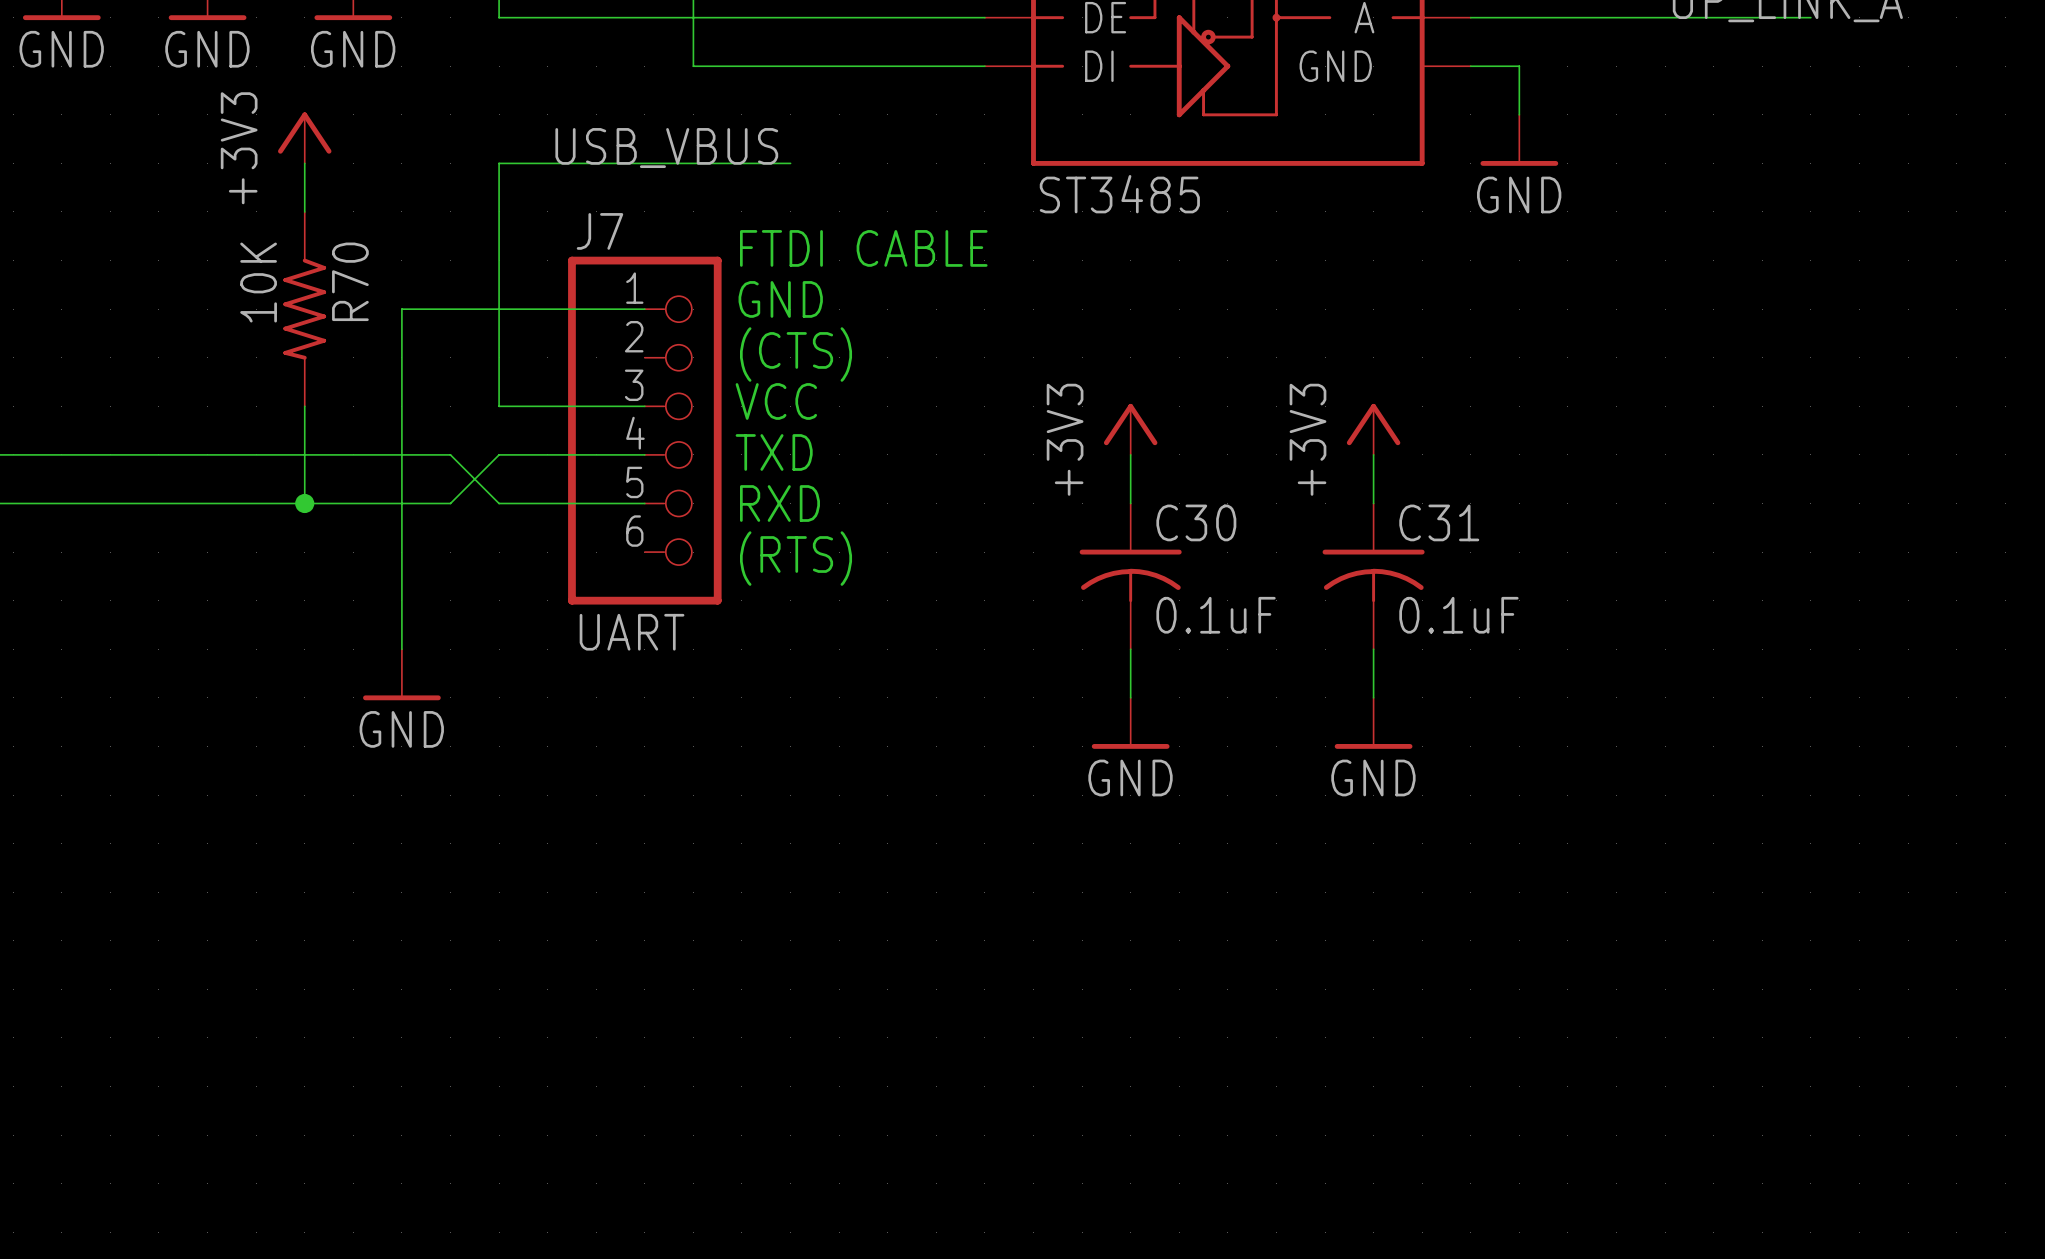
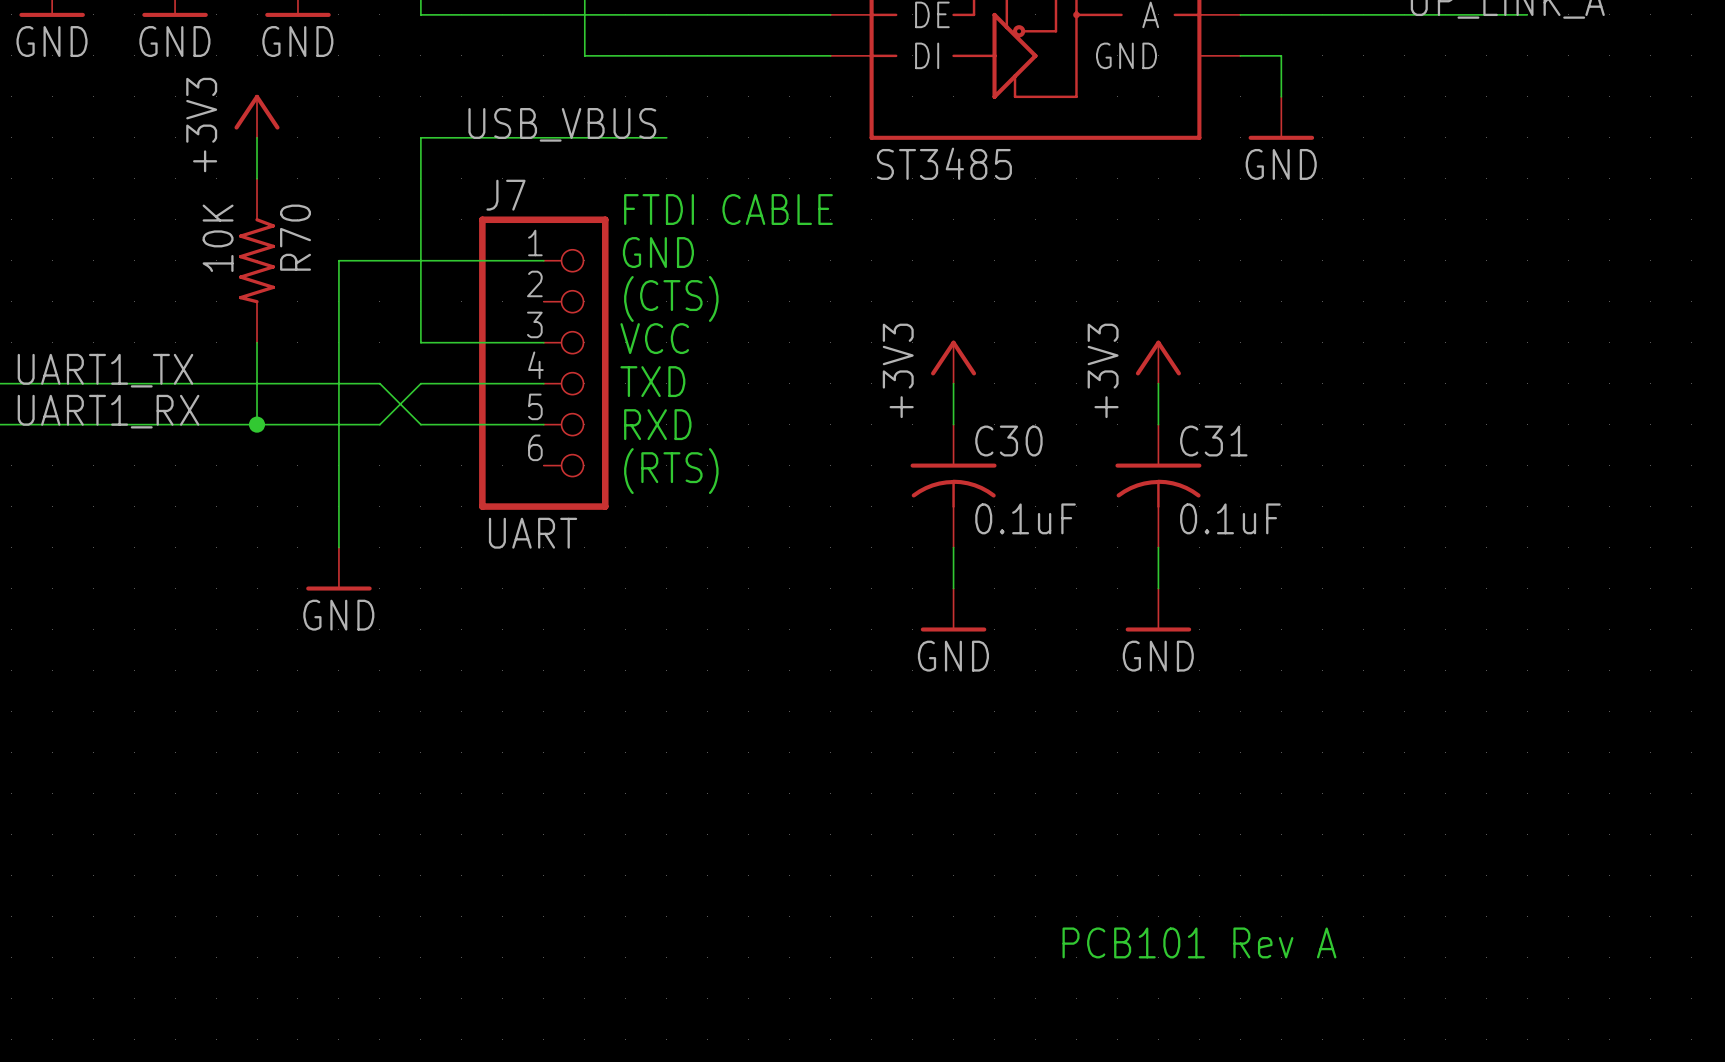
label: none -> UART1_TX (105, 370)
label: none -> UART1_RX (108, 411)
text: none -> PCB101 Rev A (1199, 942)

